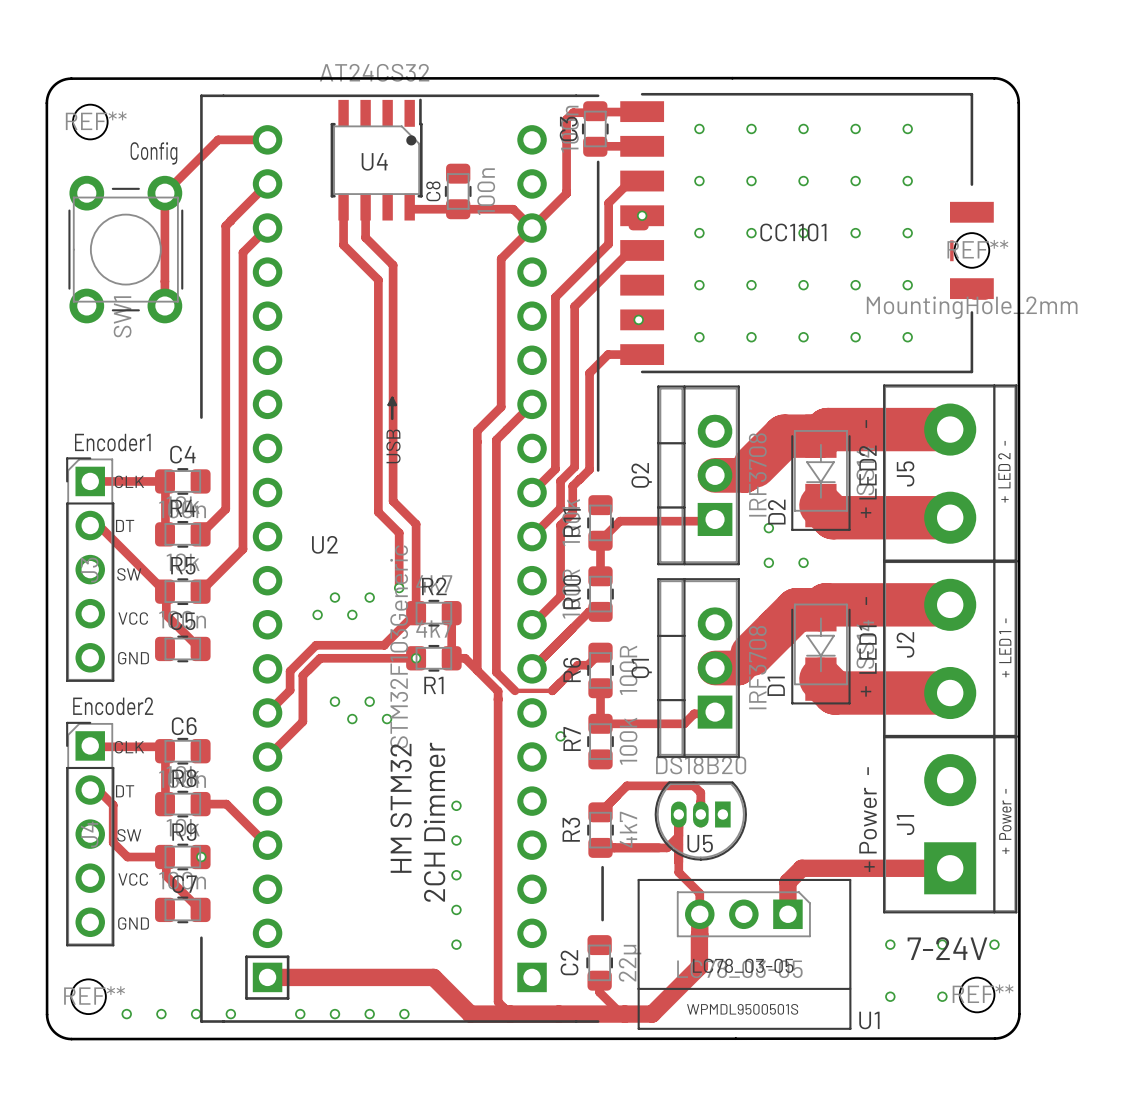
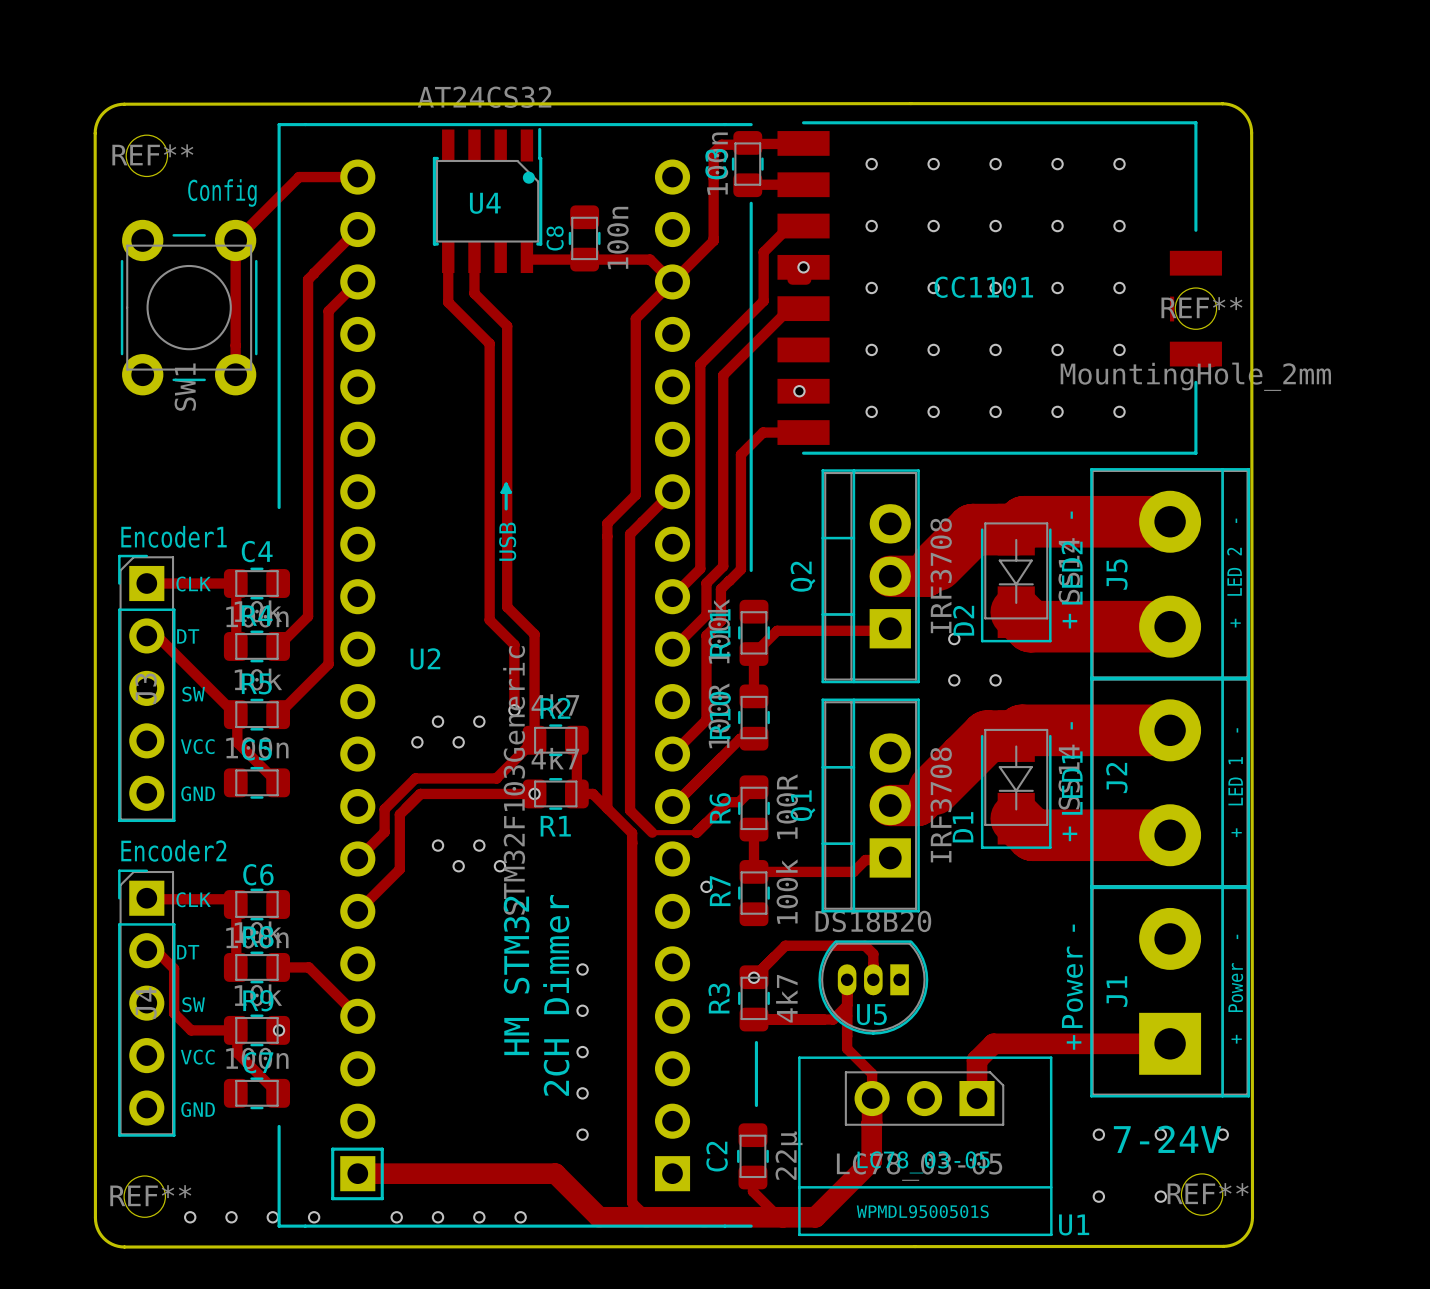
via: none -> (753, 977)

